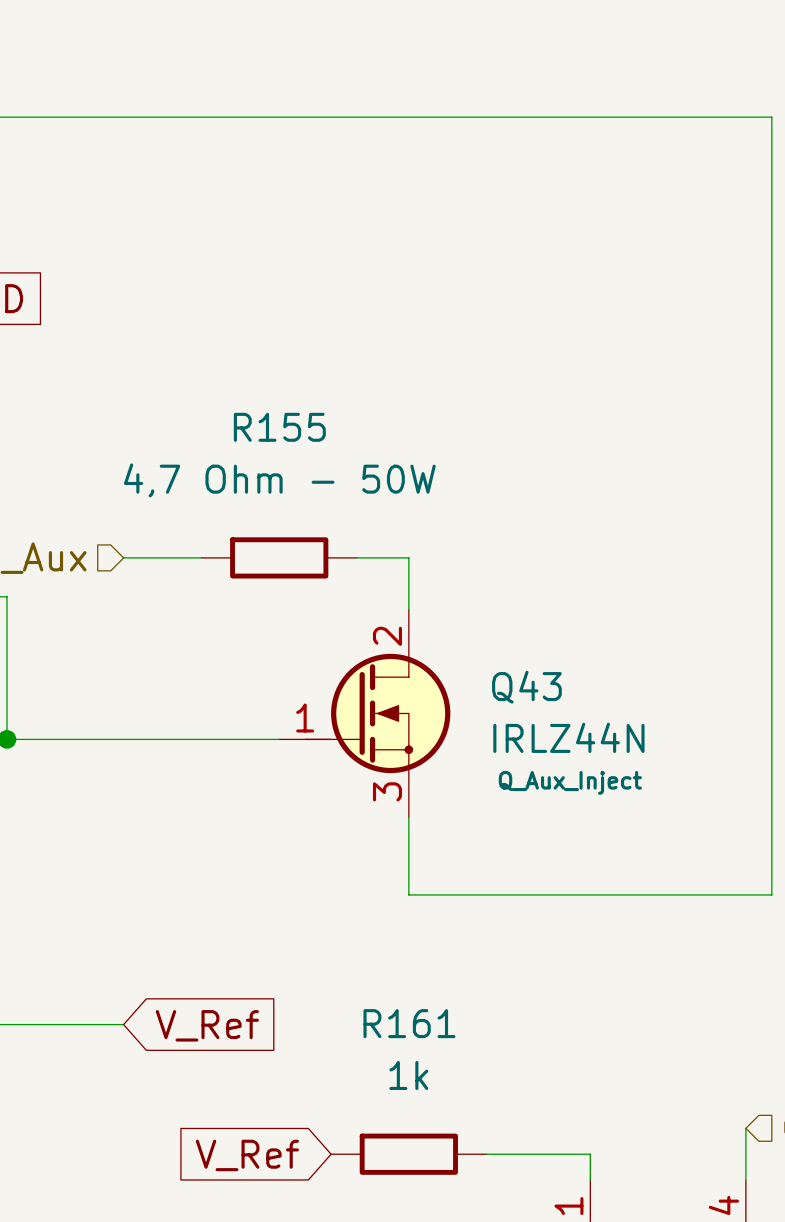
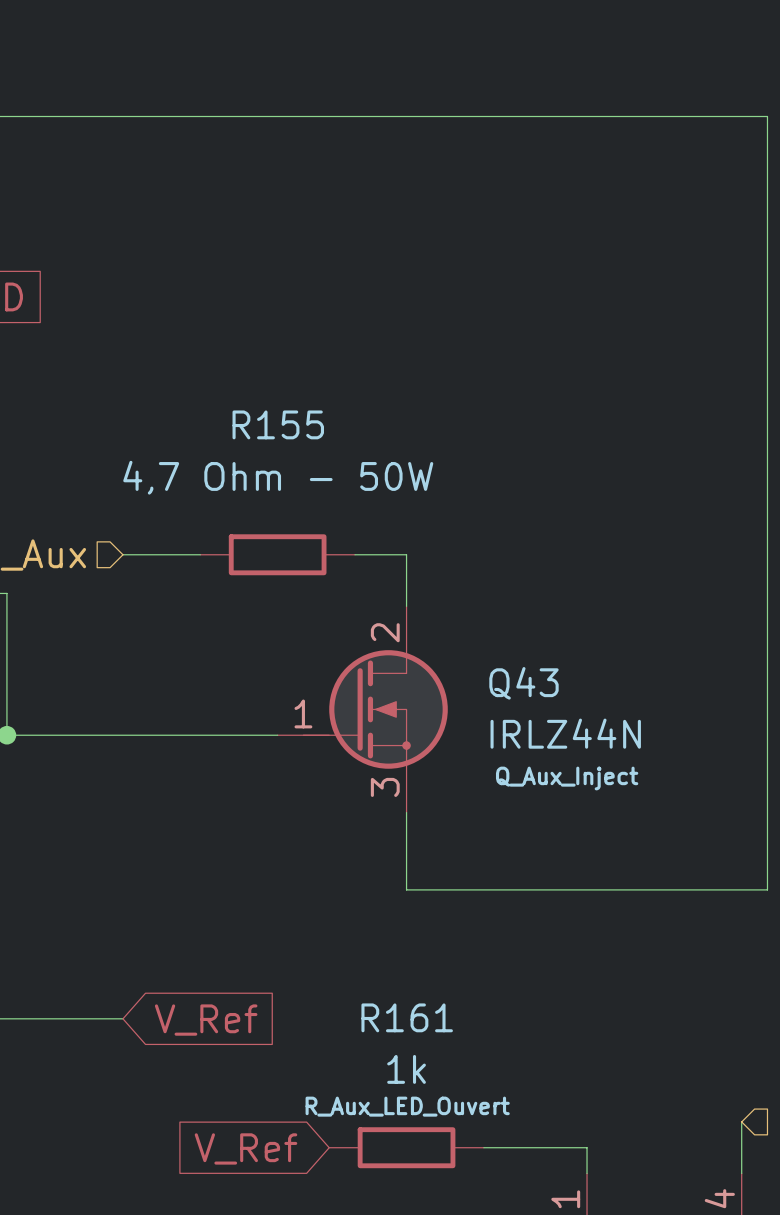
R161 text: none -> R_Aux_LED_Ouvert (407, 1106)

